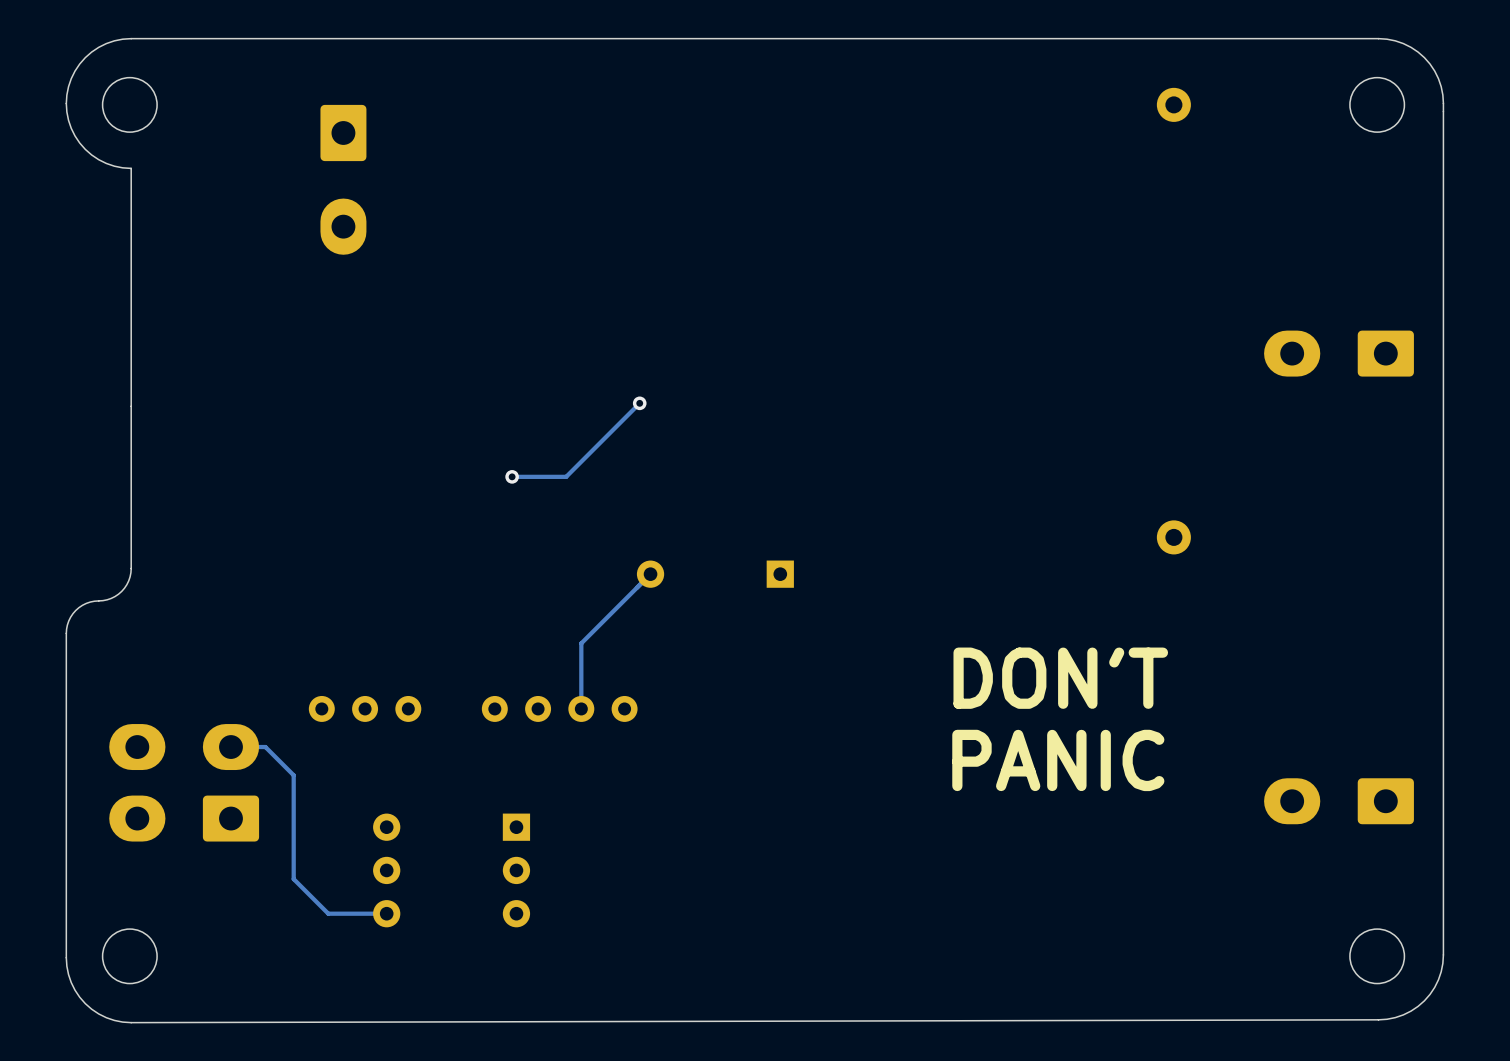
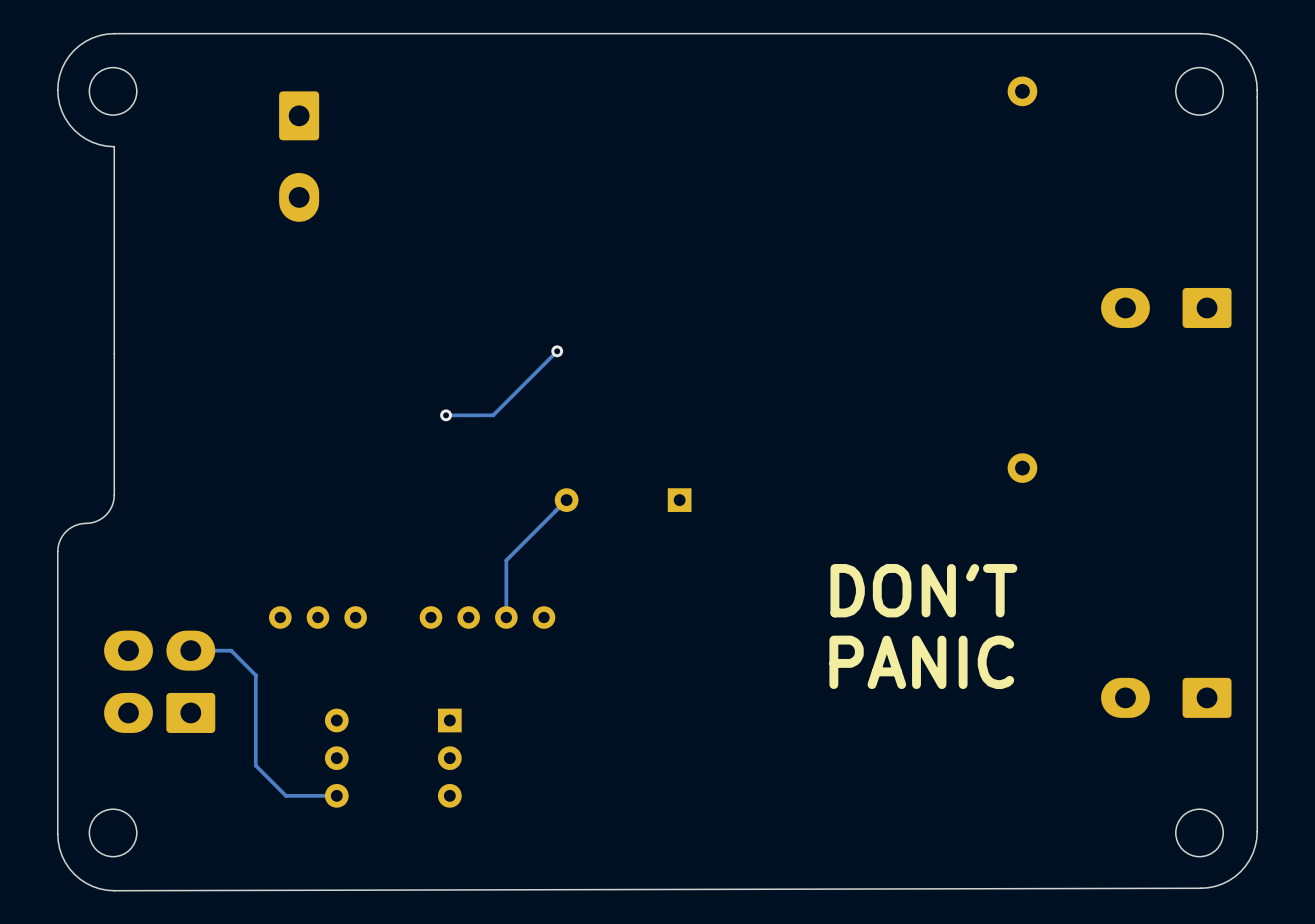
part footprint: [109, 724, 260, 842] -> [104, 630, 216, 733]

